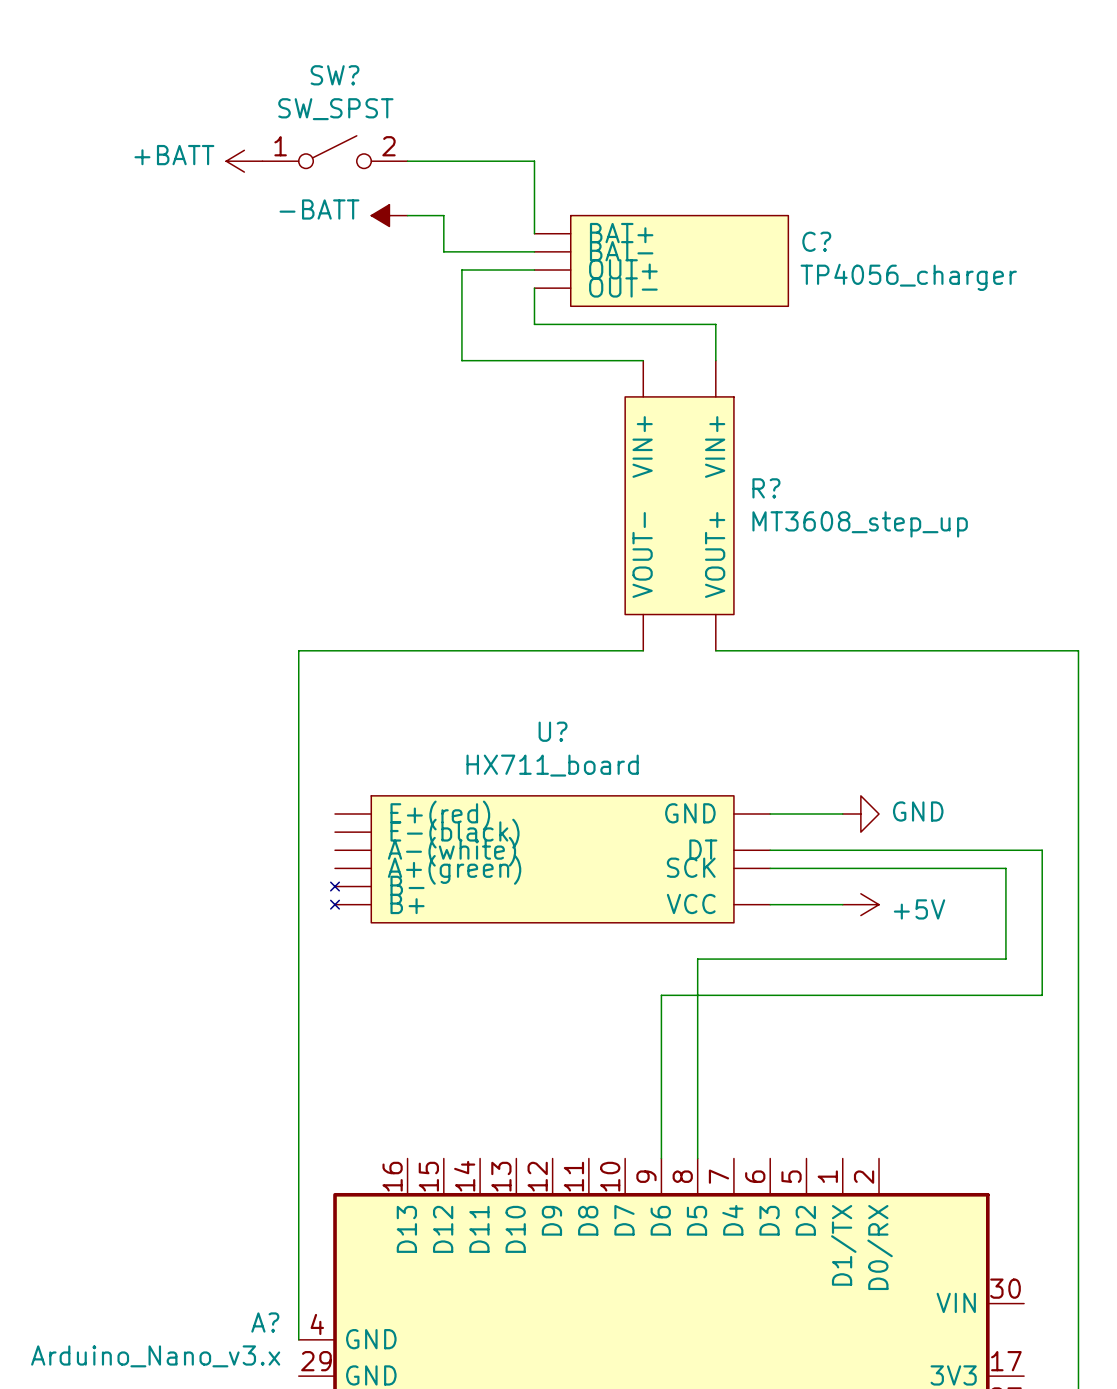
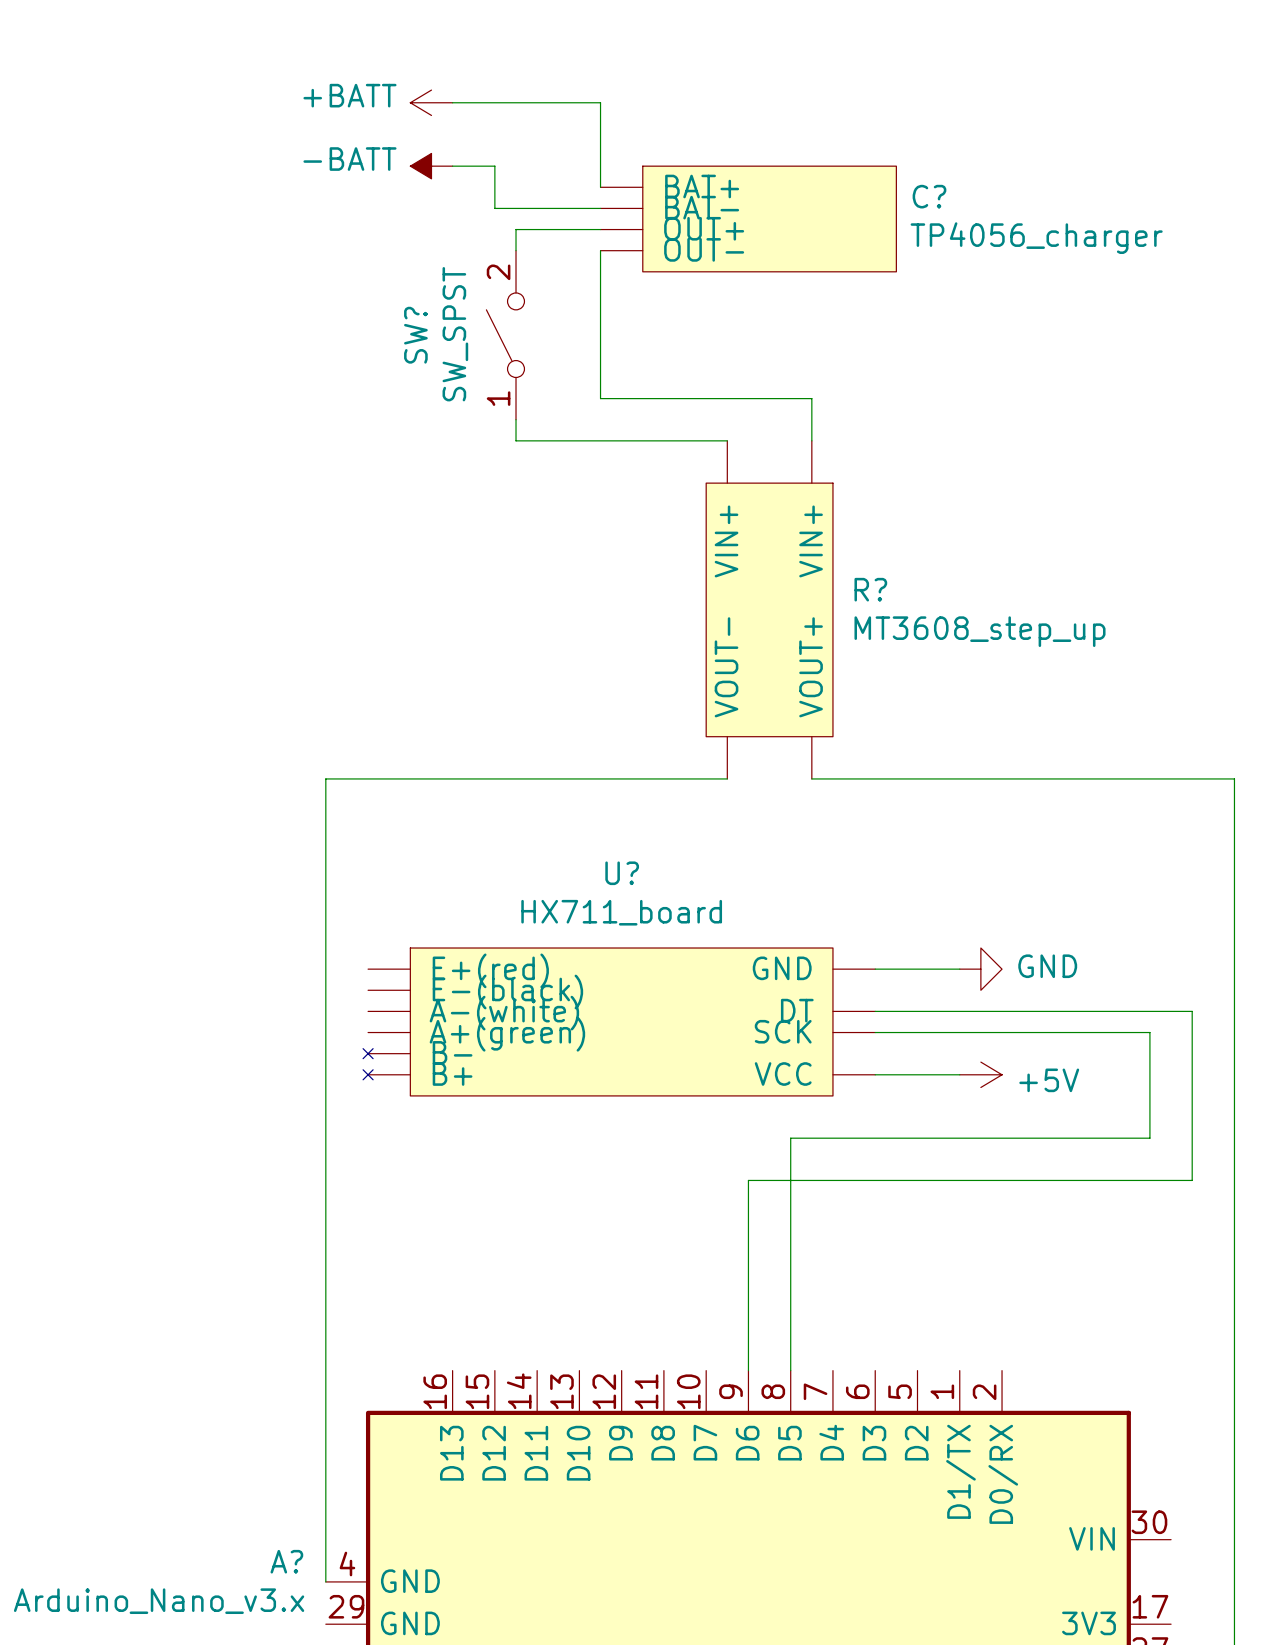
wire: none -> (452, 102) (600, 102) (600, 187)
SW? rotation: 0° (335, 152) -> 90° counterclockwise (505, 335)
SW? position: (335, 152) -> (505, 335)
power symbol position: +BATT (244, 161) -> +BATT (431, 102)
wire: (407, 161) (443, 161) -> (452, 166) (494, 166) (494, 208)
wire: (534, 161) (534, 197) -> none
wire: none -> (600, 229) (516, 229) (516, 250)
power symbol position: -BATT (389, 215) -> -BATT (431, 166)
wire: (407, 215) (443, 215) (443, 251) (534, 251) -> none
wire: none -> (600, 292) (600, 356)
C? position: (661, 260) -> (748, 218)
wire: (534, 270) (461, 270) (461, 342) -> none

